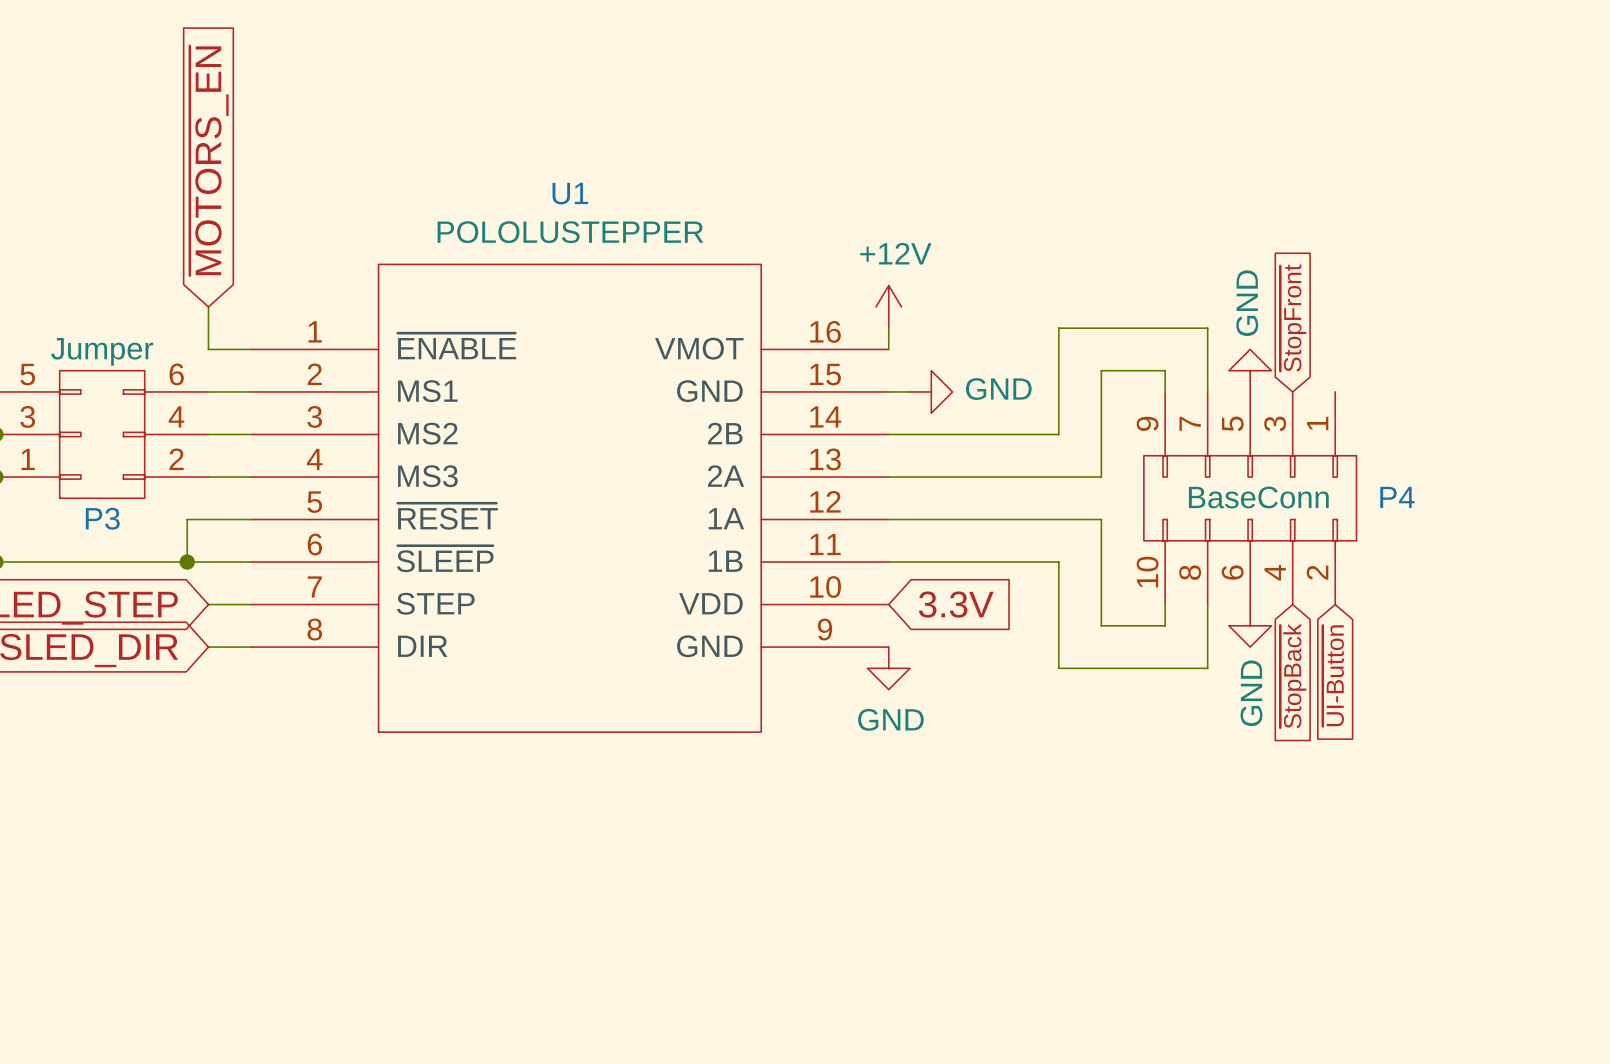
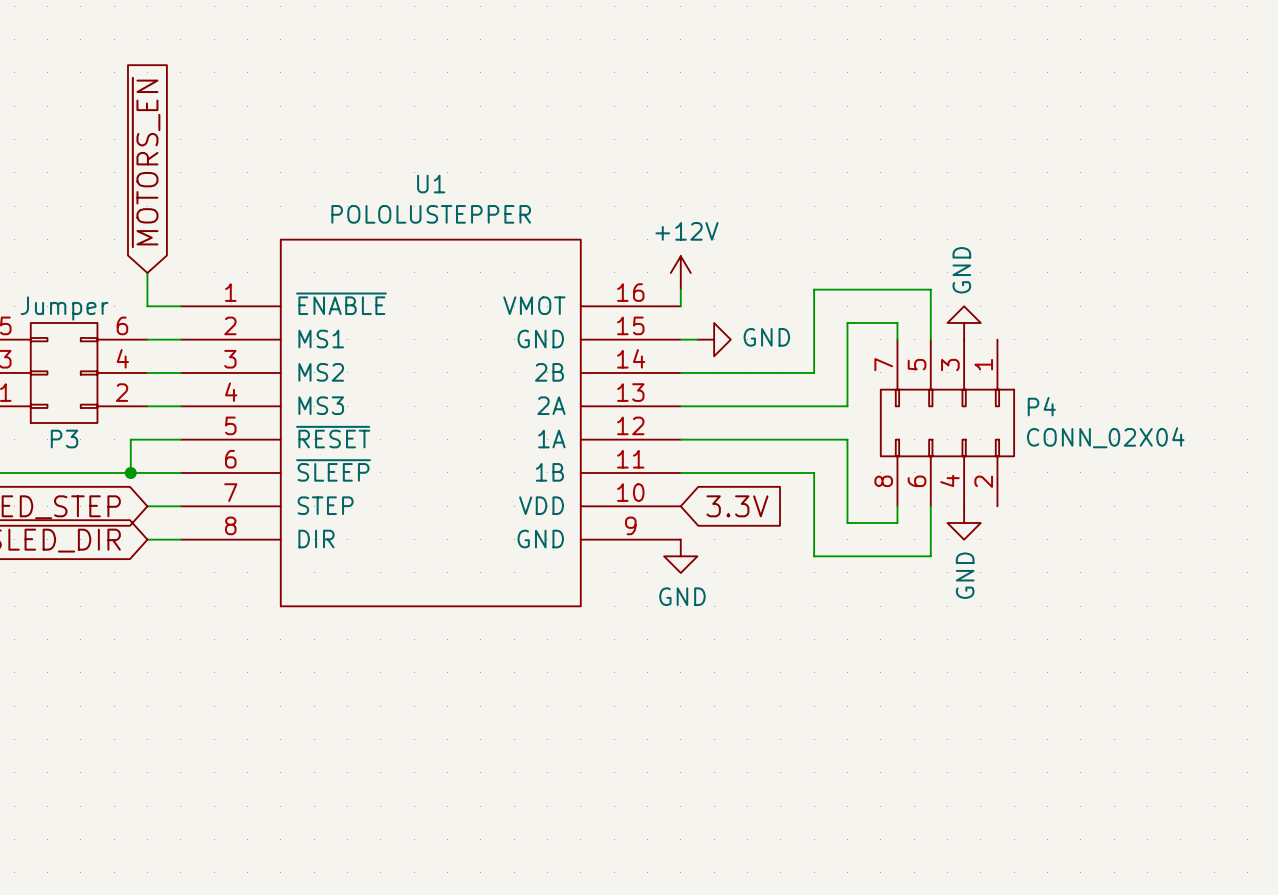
global label: ~{StopFront} (1293, 318) -> none
P4 symbol: [1143, 391, 1357, 605] -> [880, 339, 1015, 507]
P4 value: BaseConn (1258, 497) -> CONN_02X04 (1105, 437)
P4 name position: P4 (1397, 497) -> P4 (1041, 406)
global label: ~{UI-Button} (1333, 675) -> none
global label: ~{StopBack} (1293, 676) -> none

